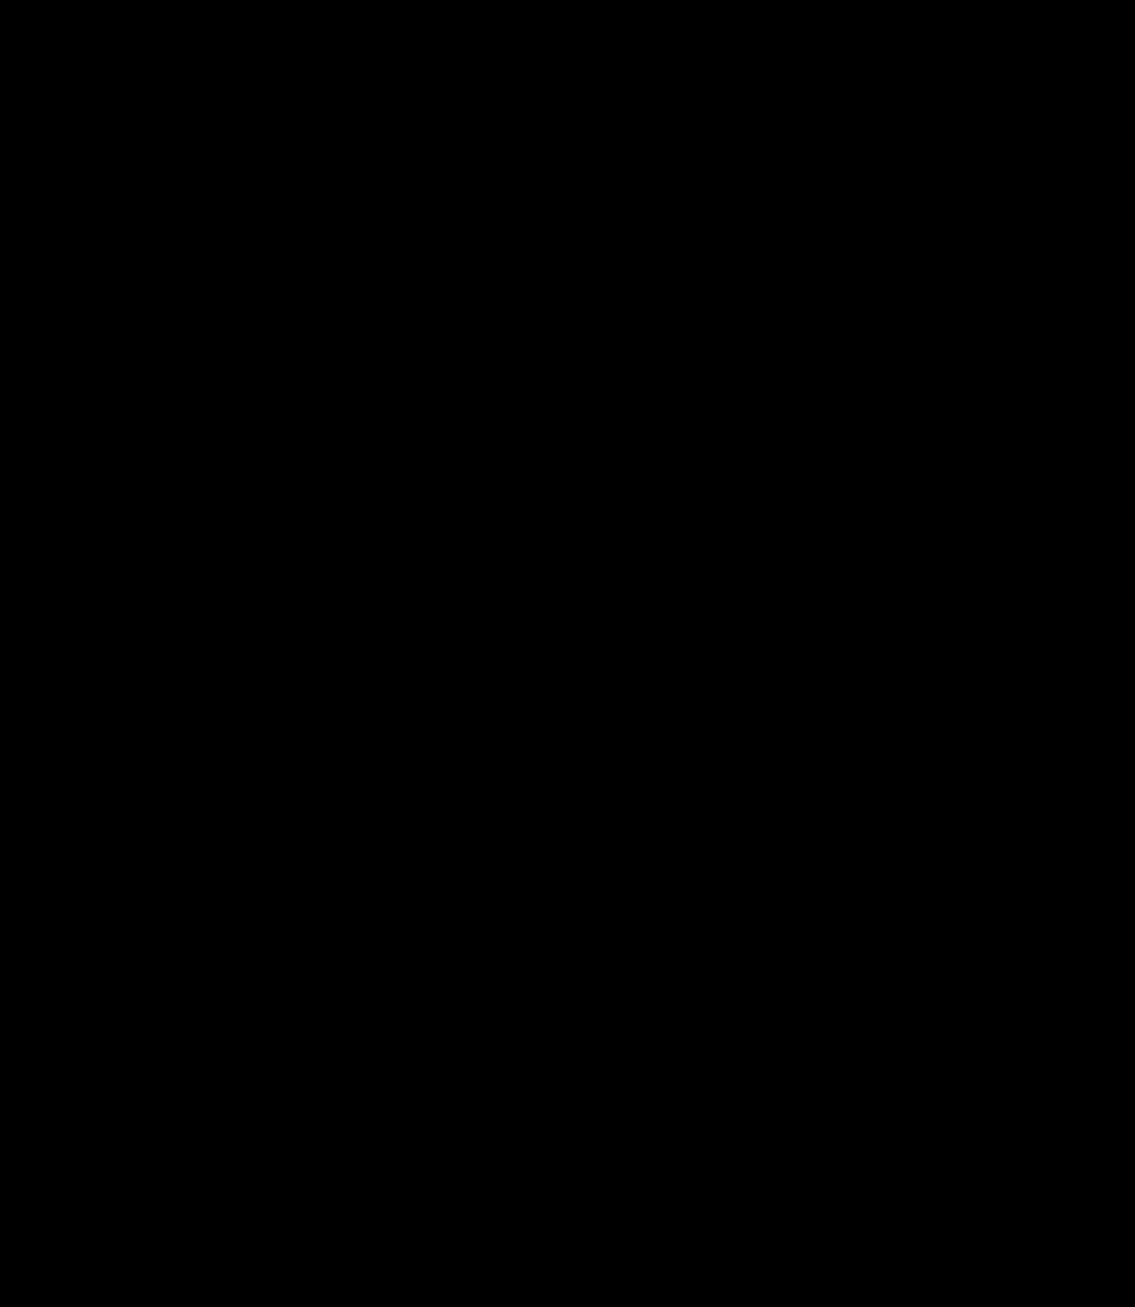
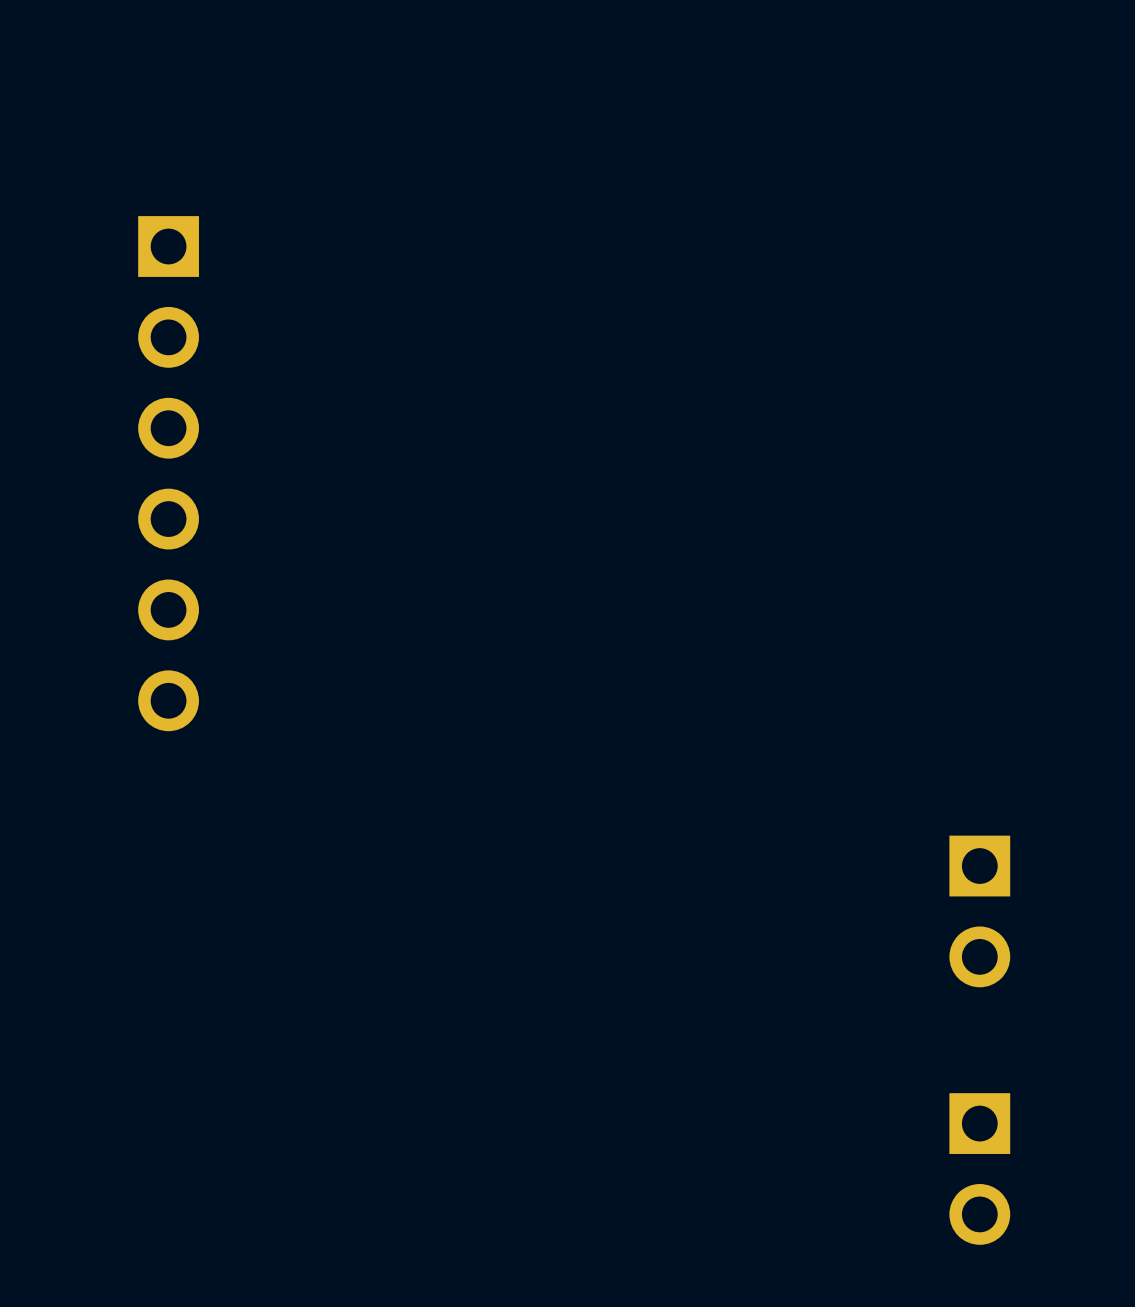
part: none -> (168, 473)
part: none -> (979, 911)
part: none -> (979, 1168)

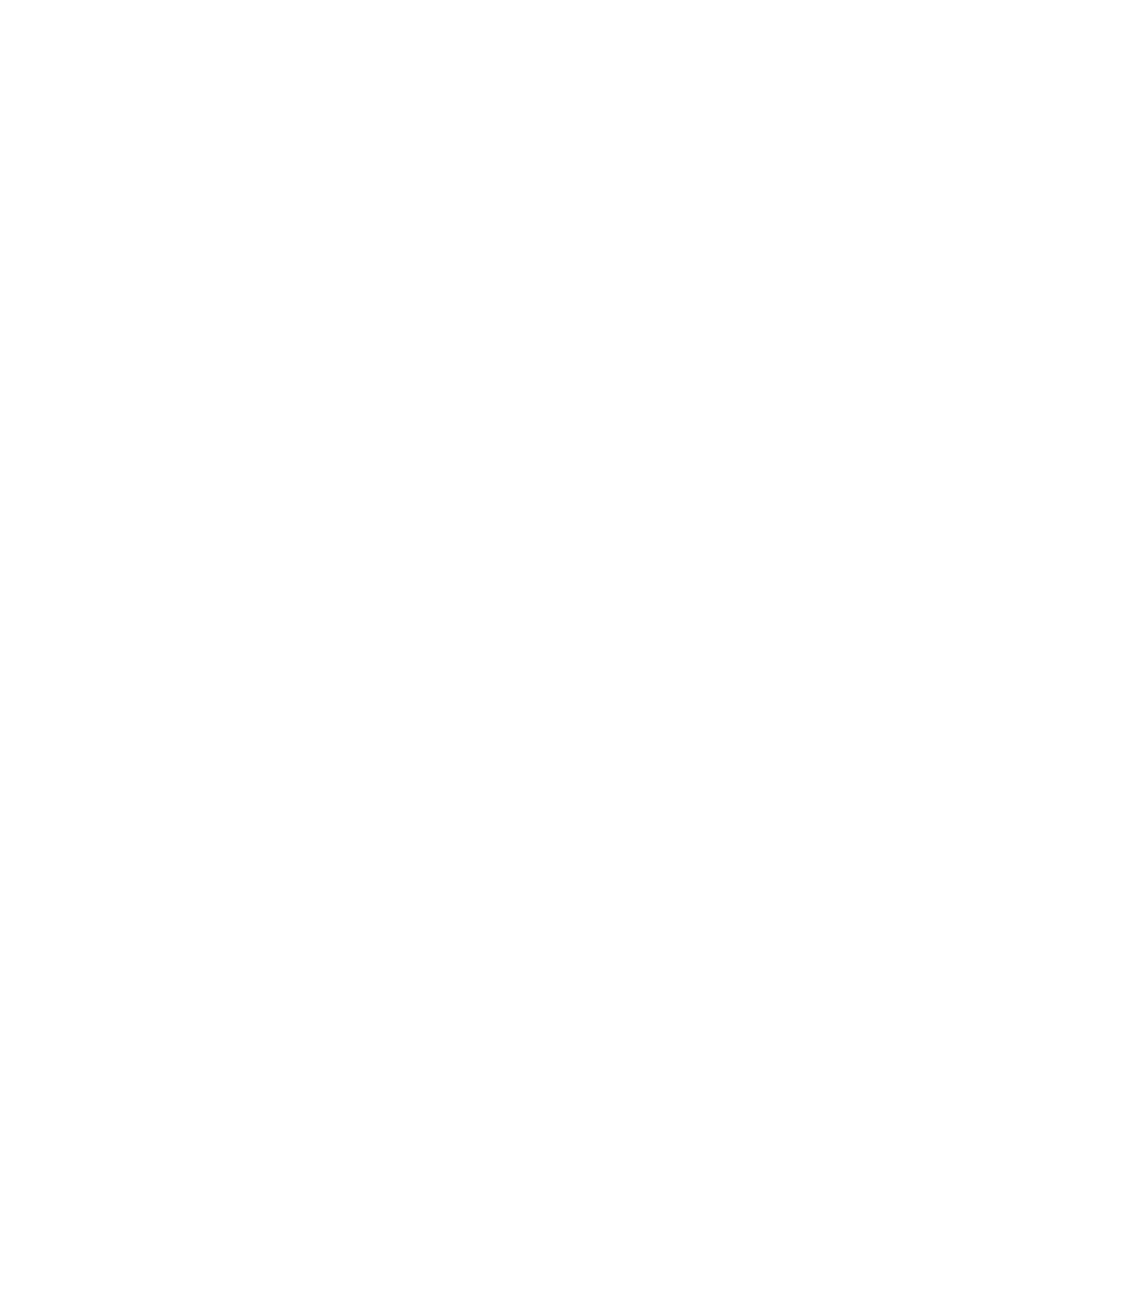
part: (168, 473) -> none
part: (979, 911) -> none
part: (979, 1168) -> none

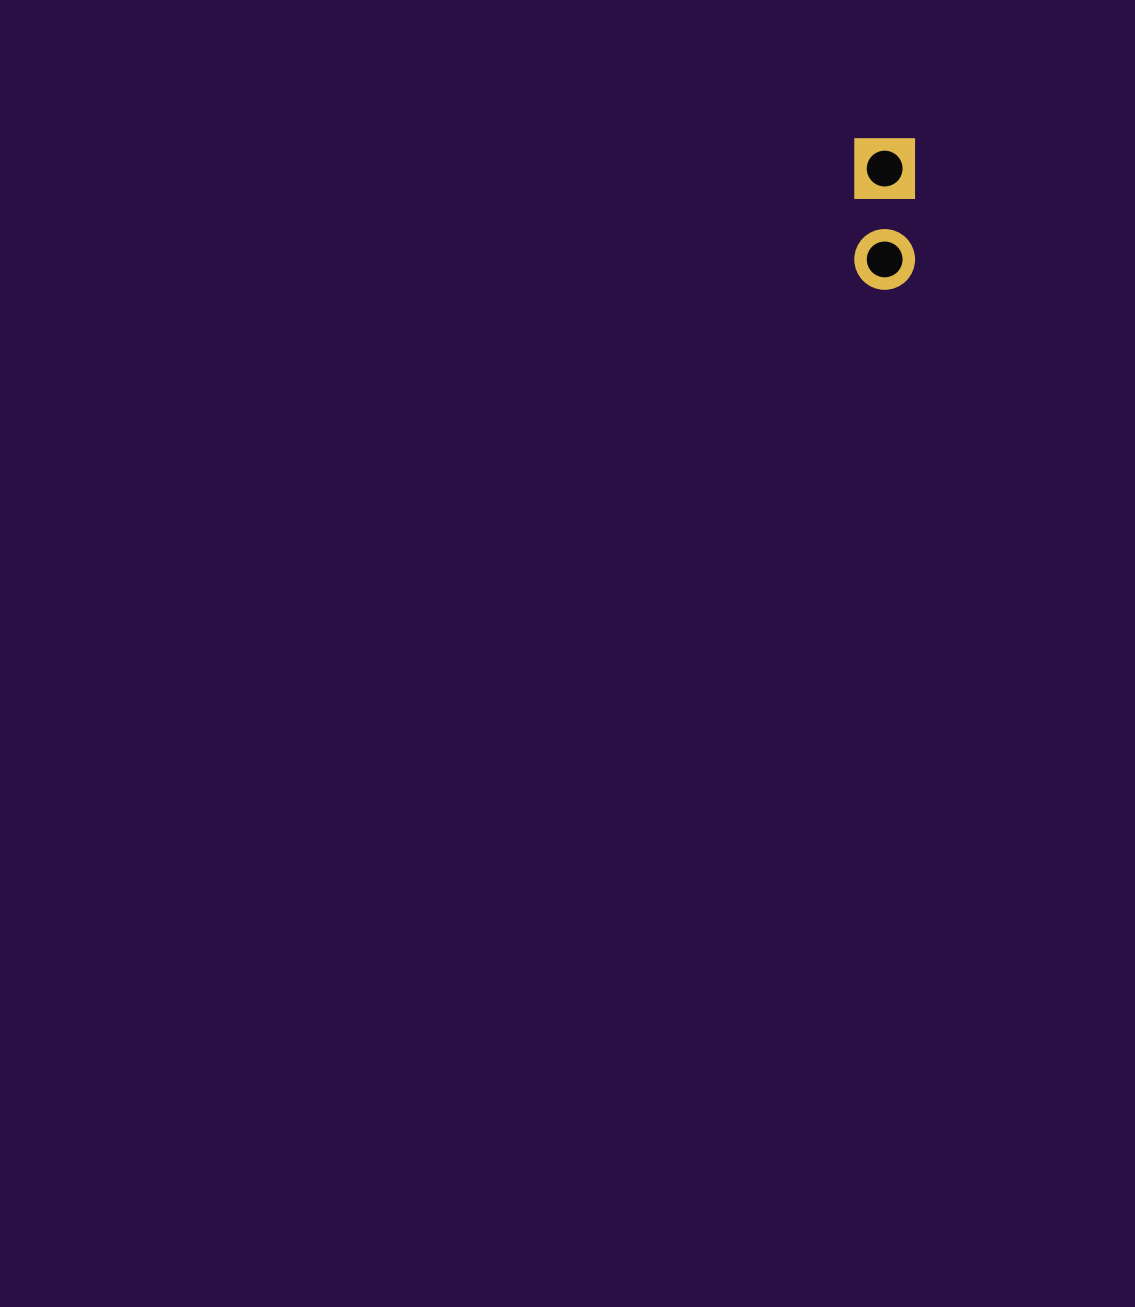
part: none -> (884, 213)

